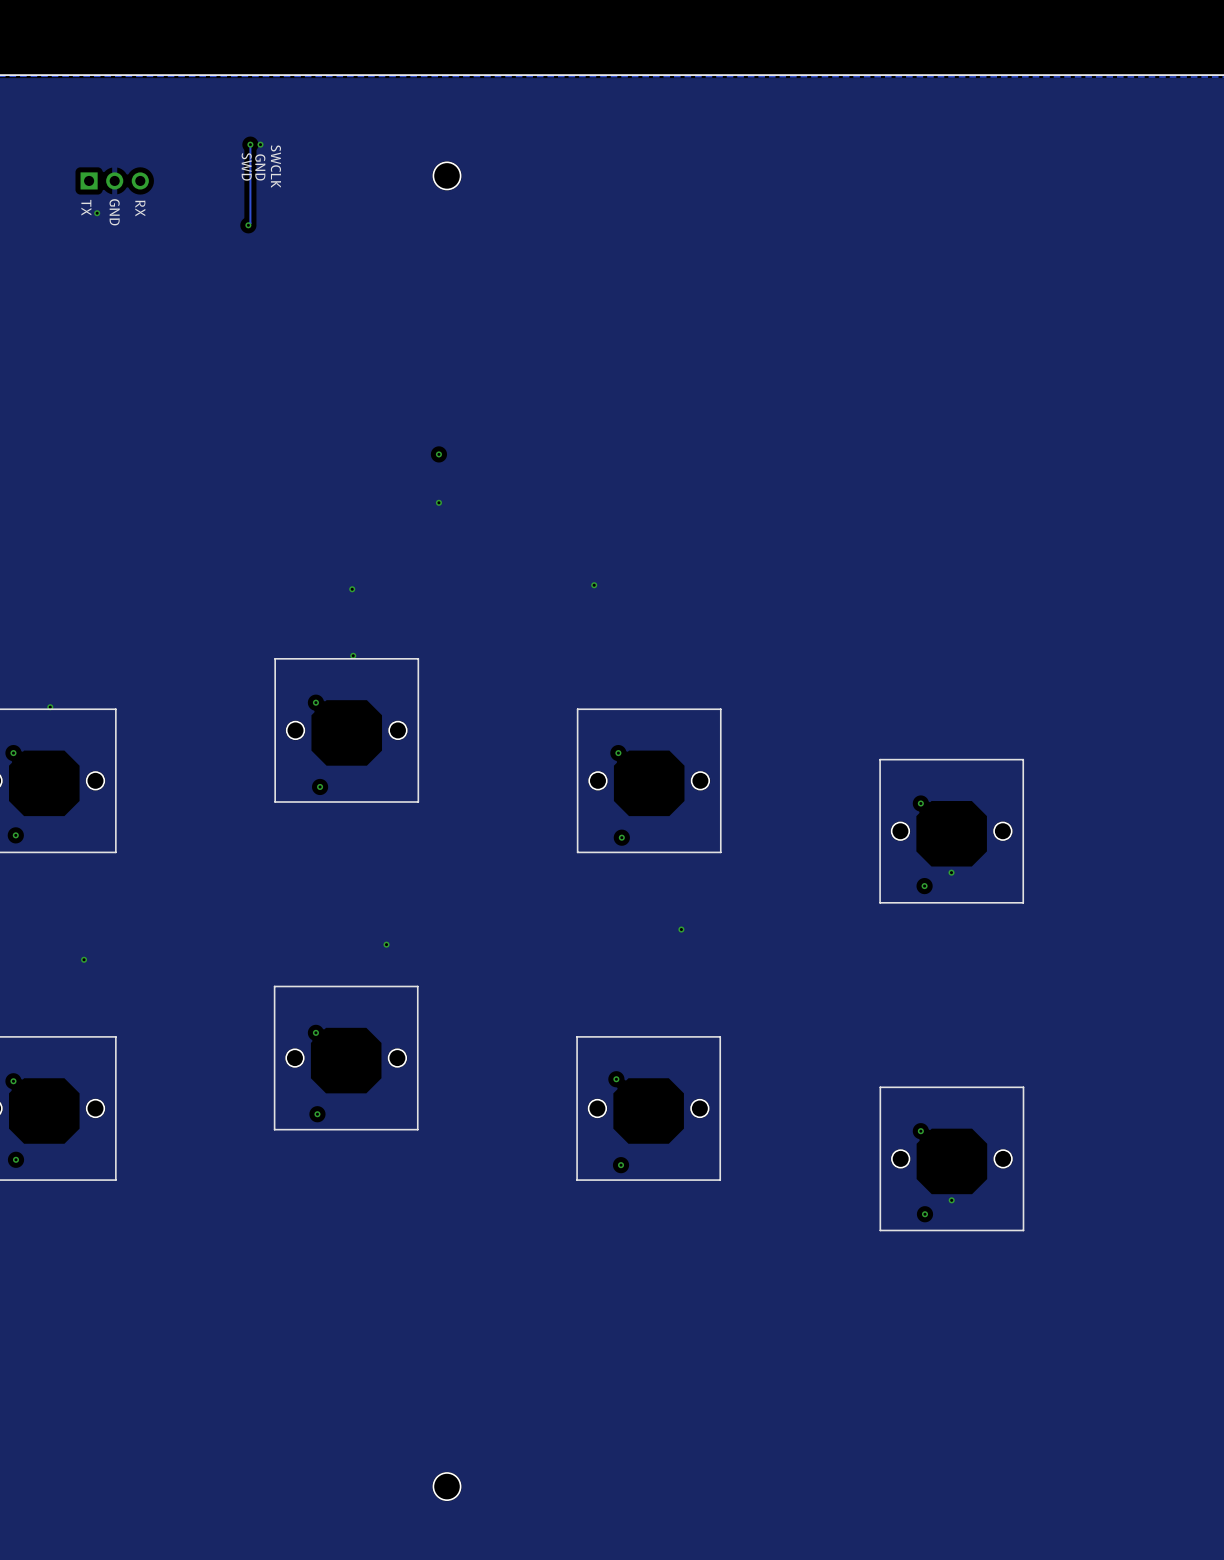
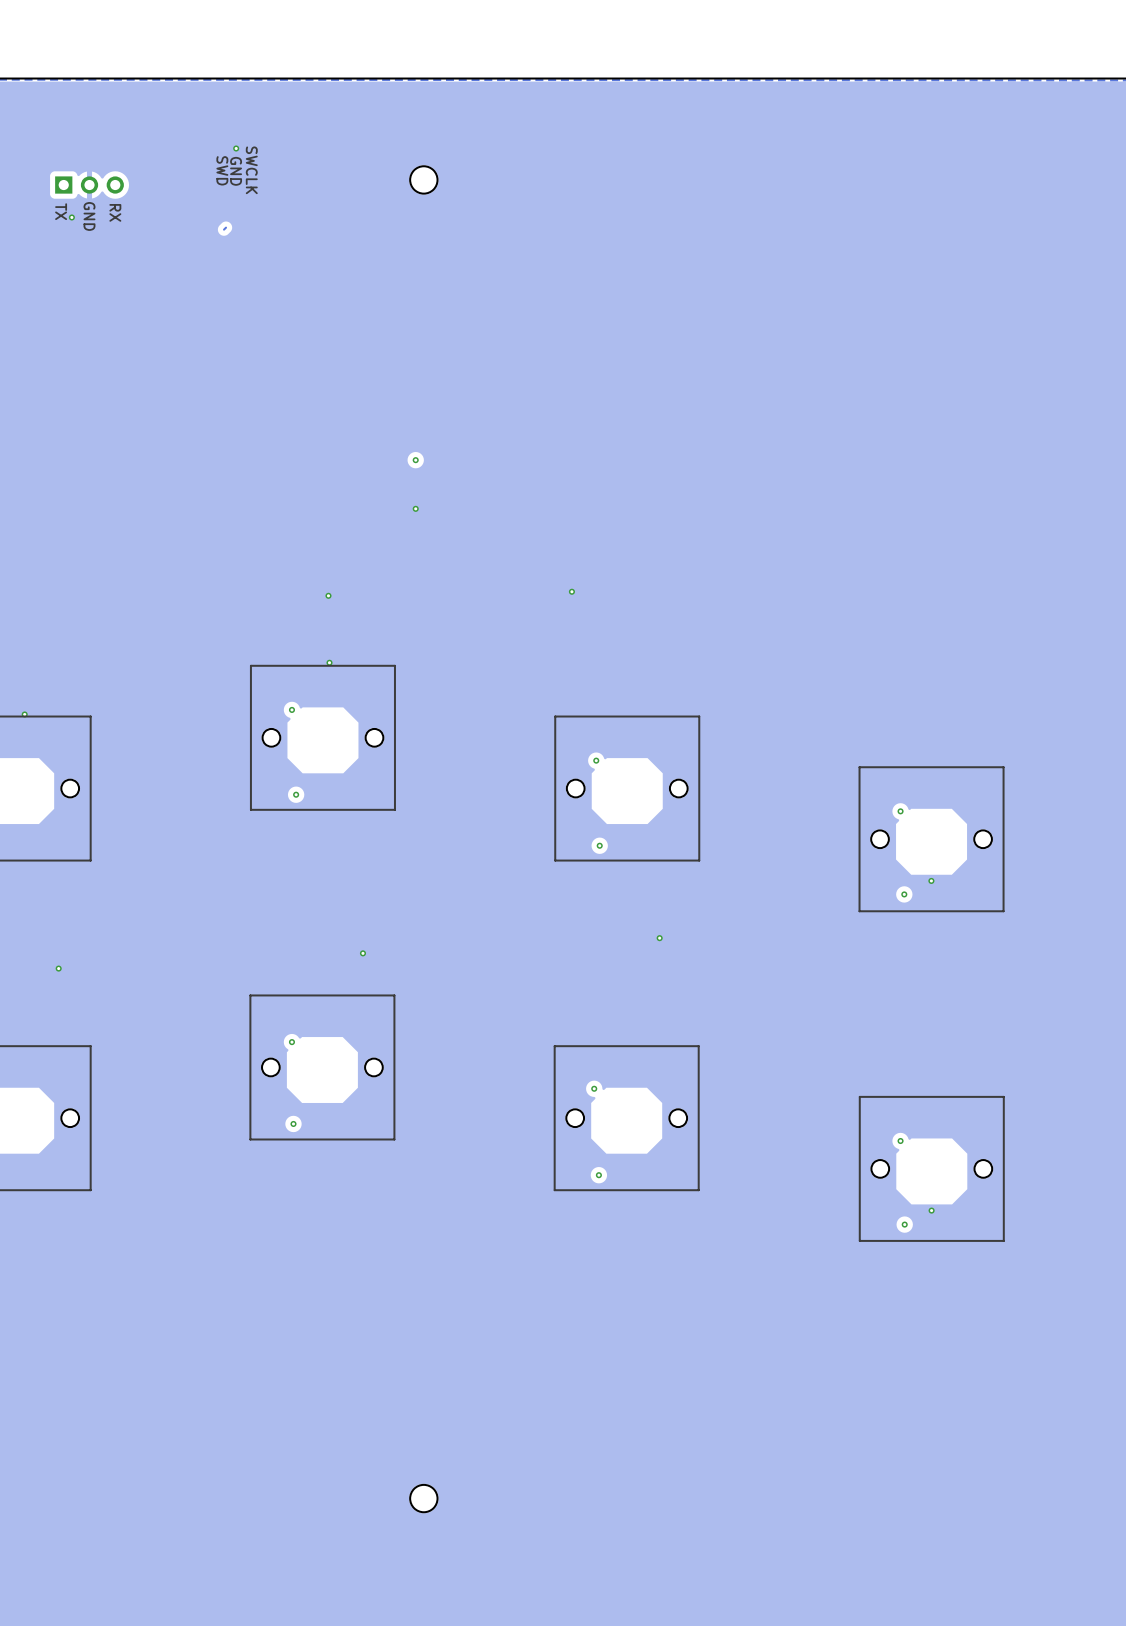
track: (250, 144) (250, 223) -> none
via: (250, 144) -> none
via: (248, 225) -> none

